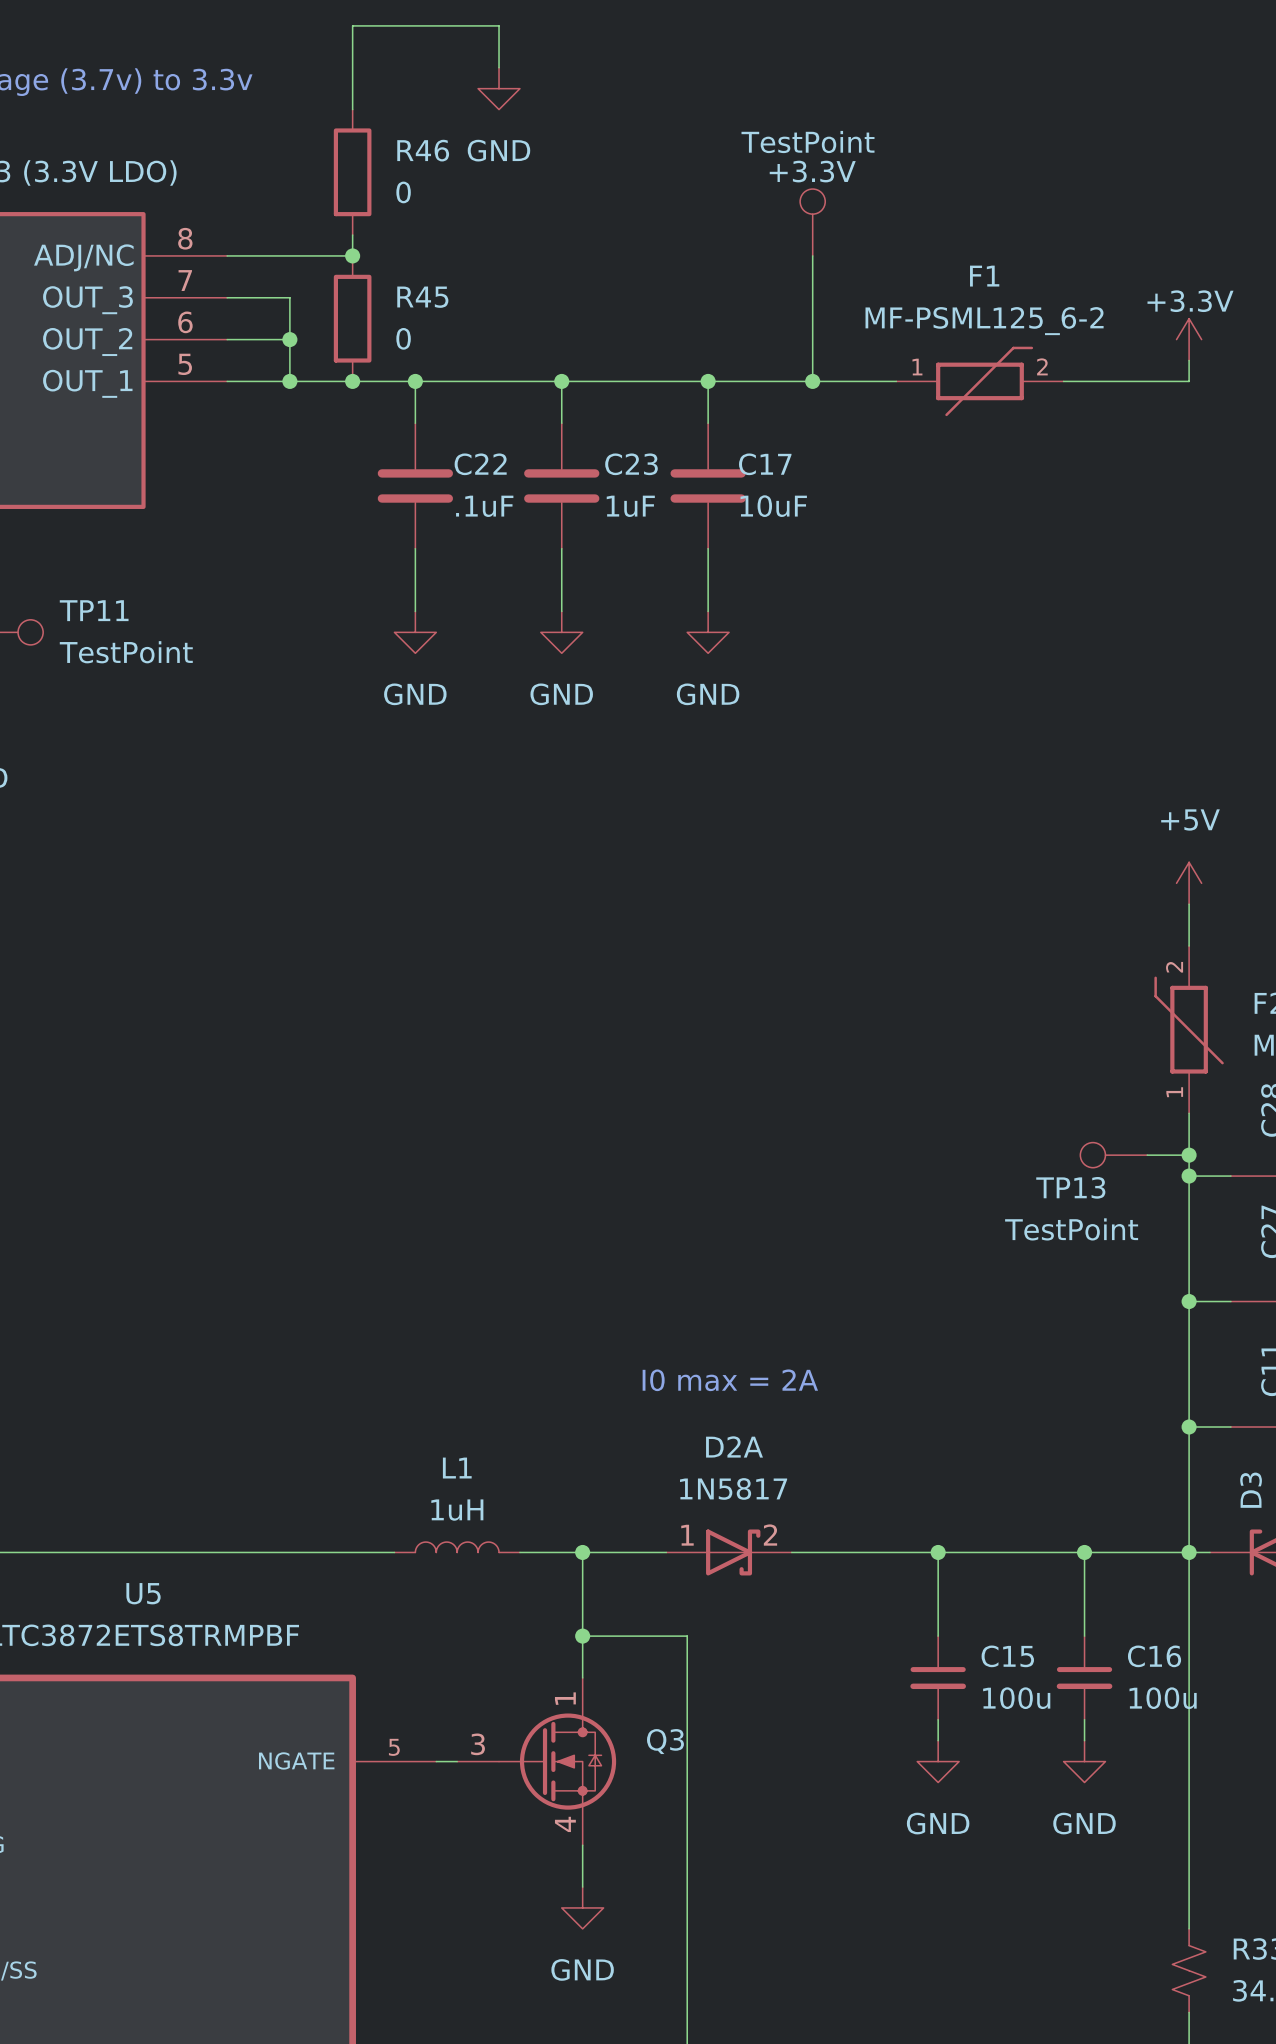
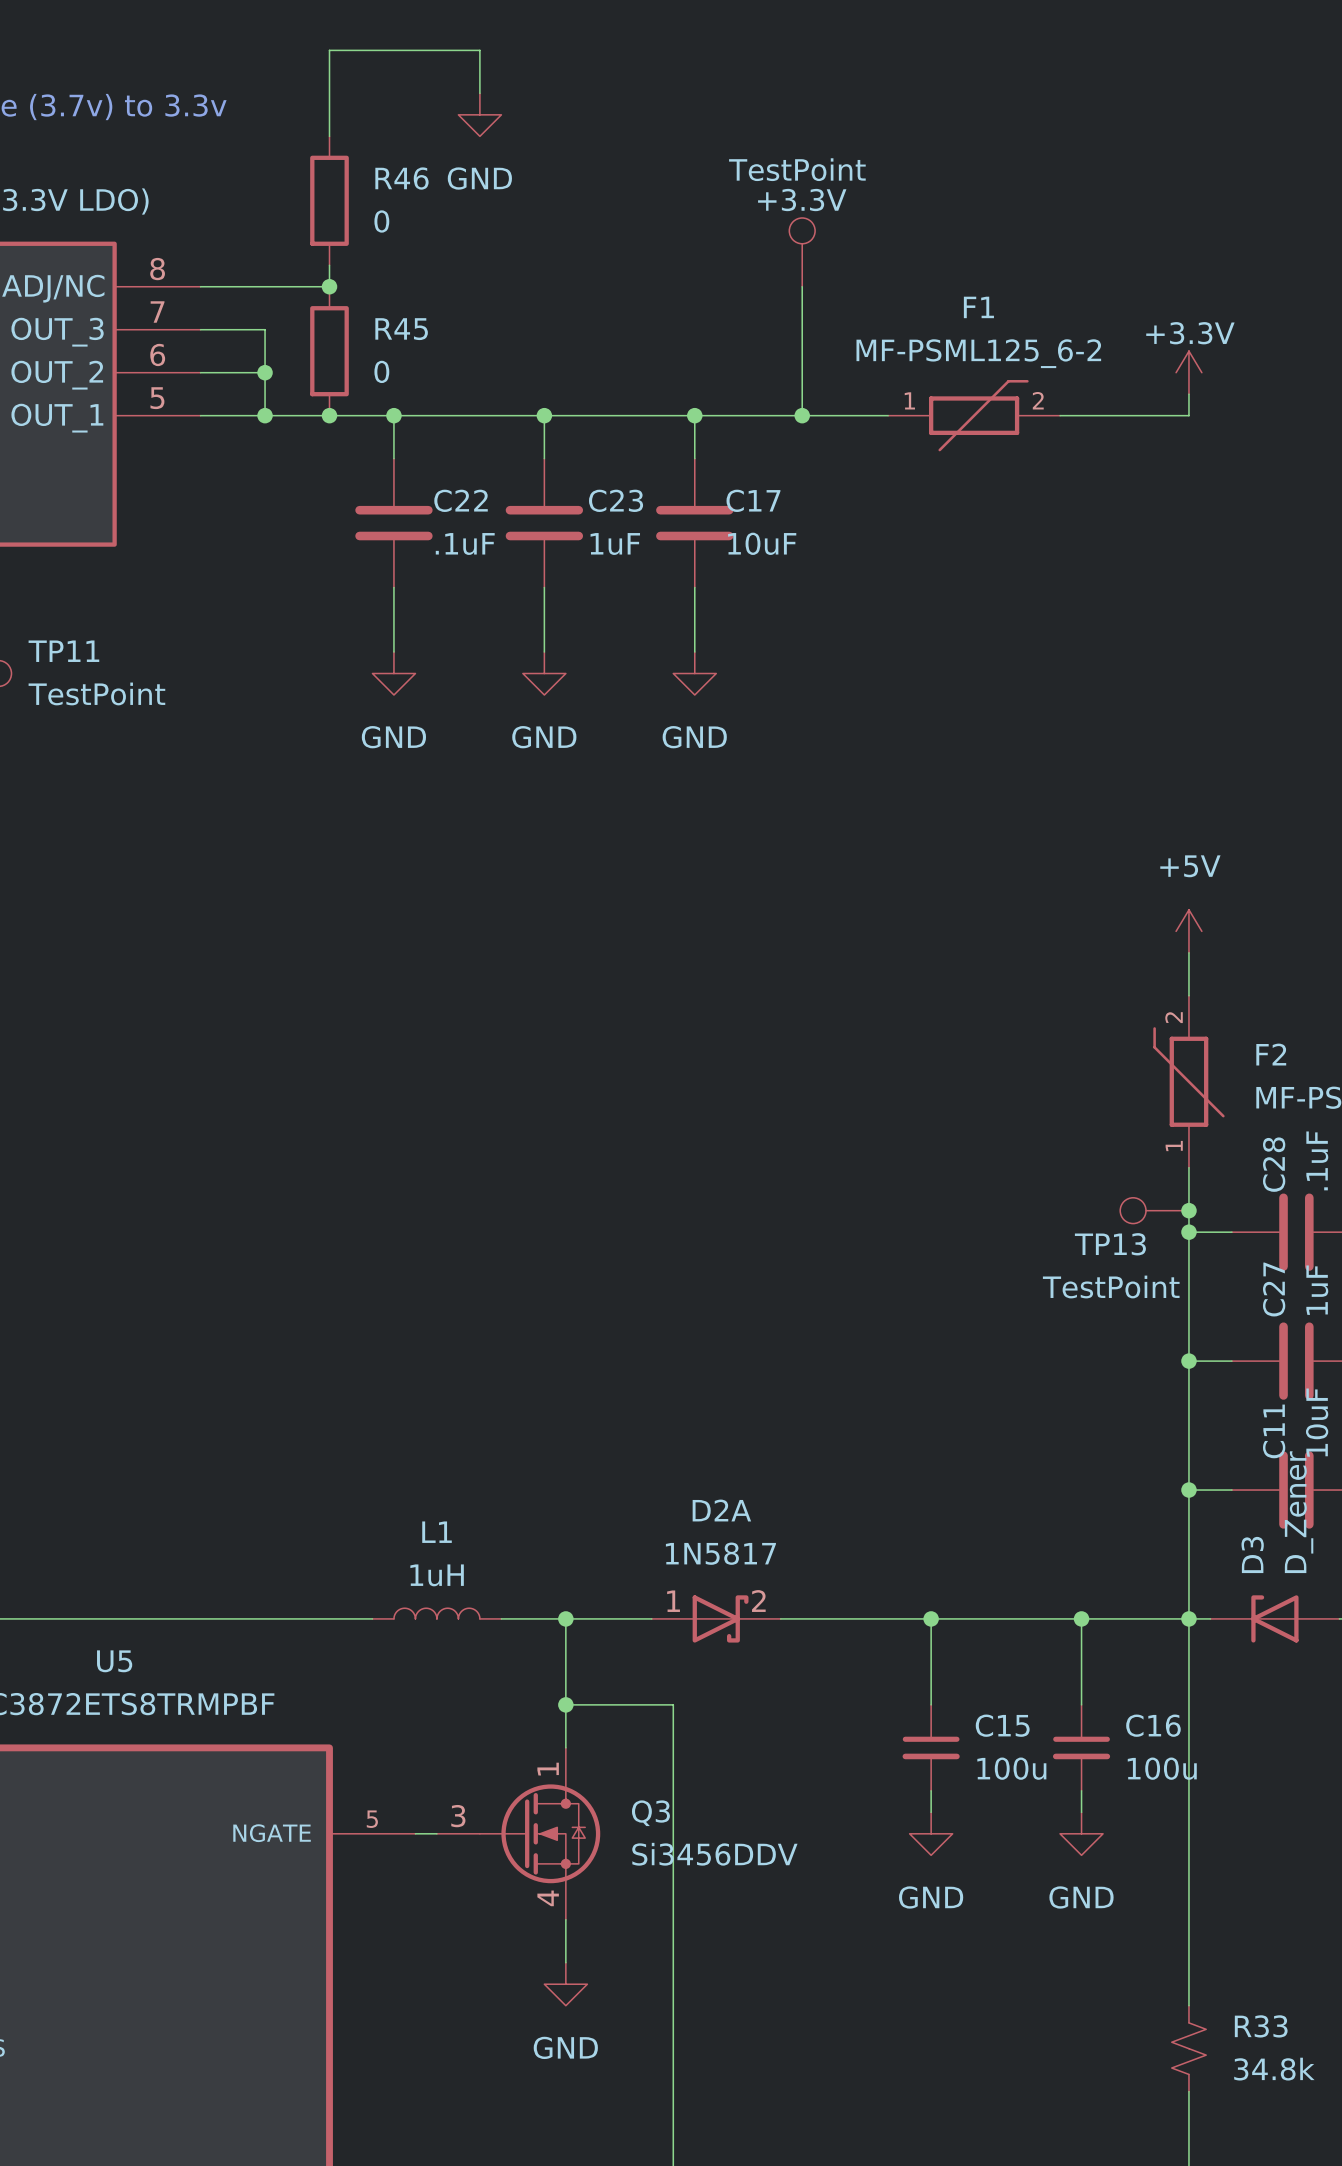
TP13 position: (1113, 1155) -> (1154, 1210)
text: I0 max = 2A (730, 1380) -> none
Q3 value: none -> Si3456DDV (714, 1854)

